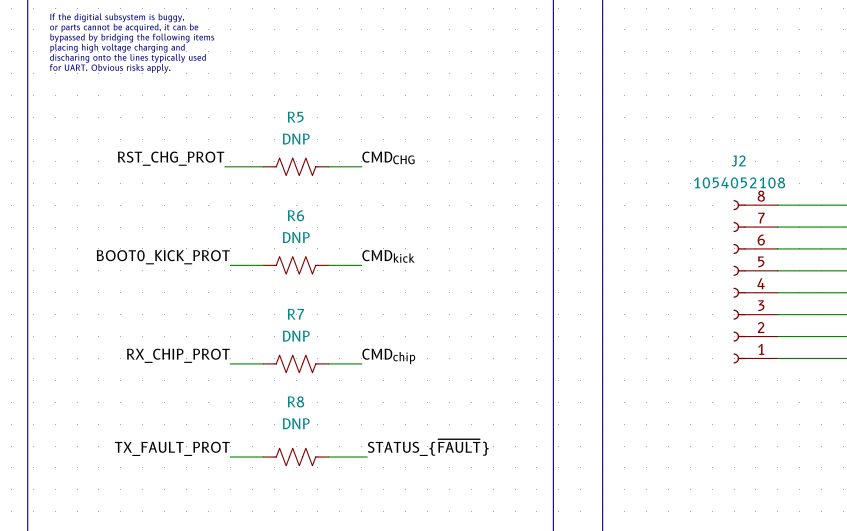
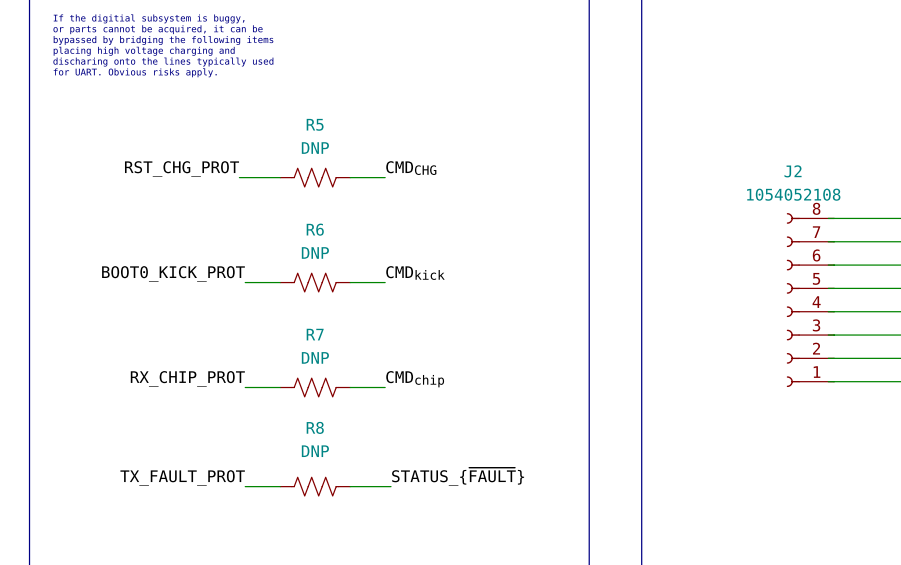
J2 symbol: [733, 200, 778, 364] -> [786, 213, 835, 388]

